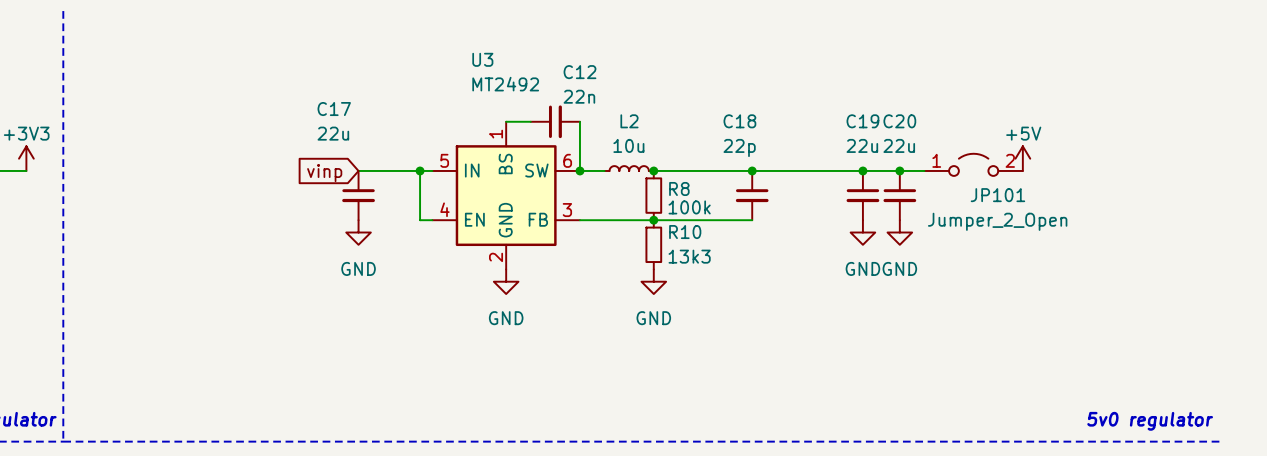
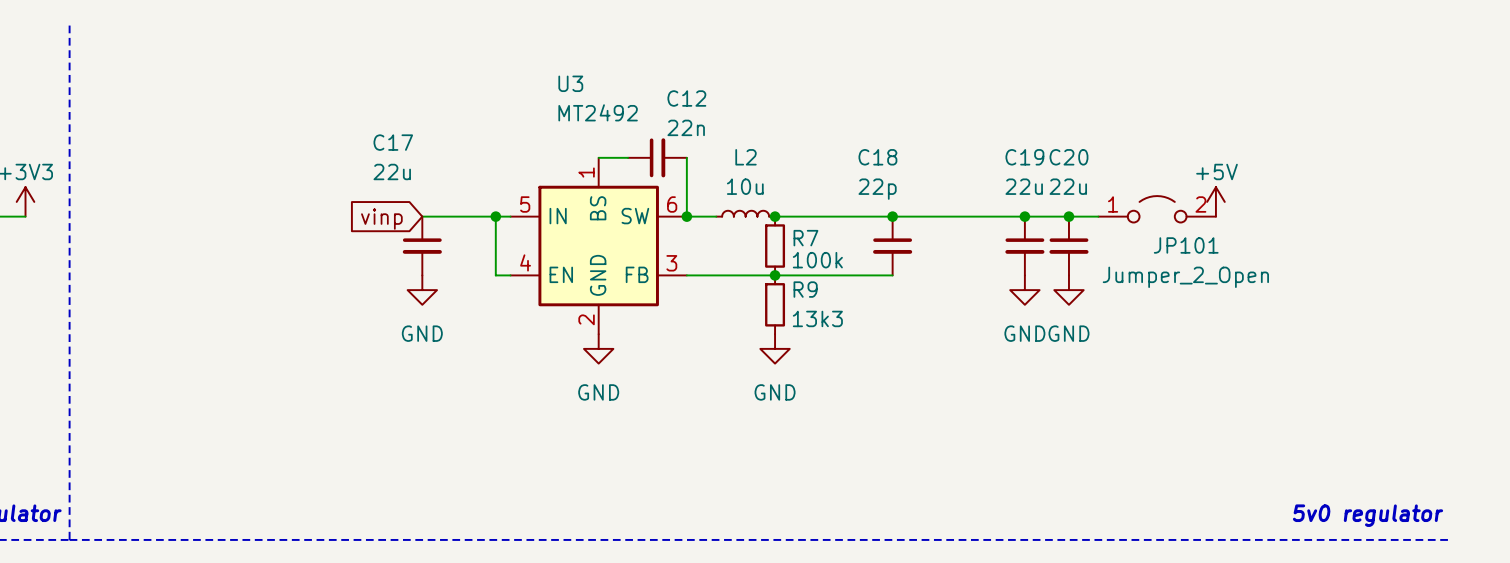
R8 name: R8 (679, 188) -> R7 (805, 238)
R10 name: R10 (685, 232) -> R9 (805, 289)

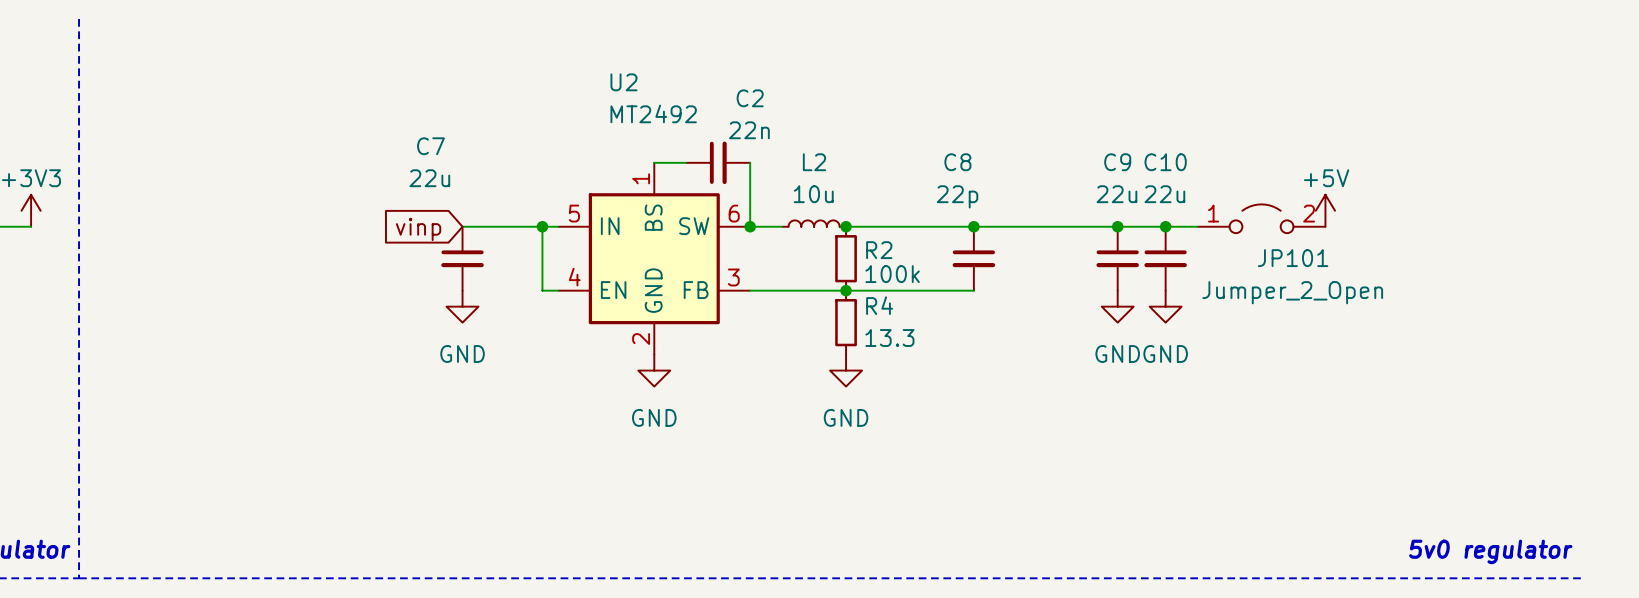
U3 name: U3 (570, 83) -> U2 (623, 82)
C12 name: C12 (686, 98) -> C2 (750, 98)
C17 name: C17 (393, 142) -> C7 (430, 146)
C18 name: C18 (877, 157) -> C8 (957, 162)
C19 name: C19 (1024, 157) -> C9 (1117, 162)
C20 name: C20 (1068, 157) -> C10 (1165, 162)
R7 name: R7 (805, 238) -> R2 (879, 250)
R9 name: R9 (805, 289) -> R4 (879, 305)
R9 value: 13k3 (817, 318) -> 13.3 (889, 338)

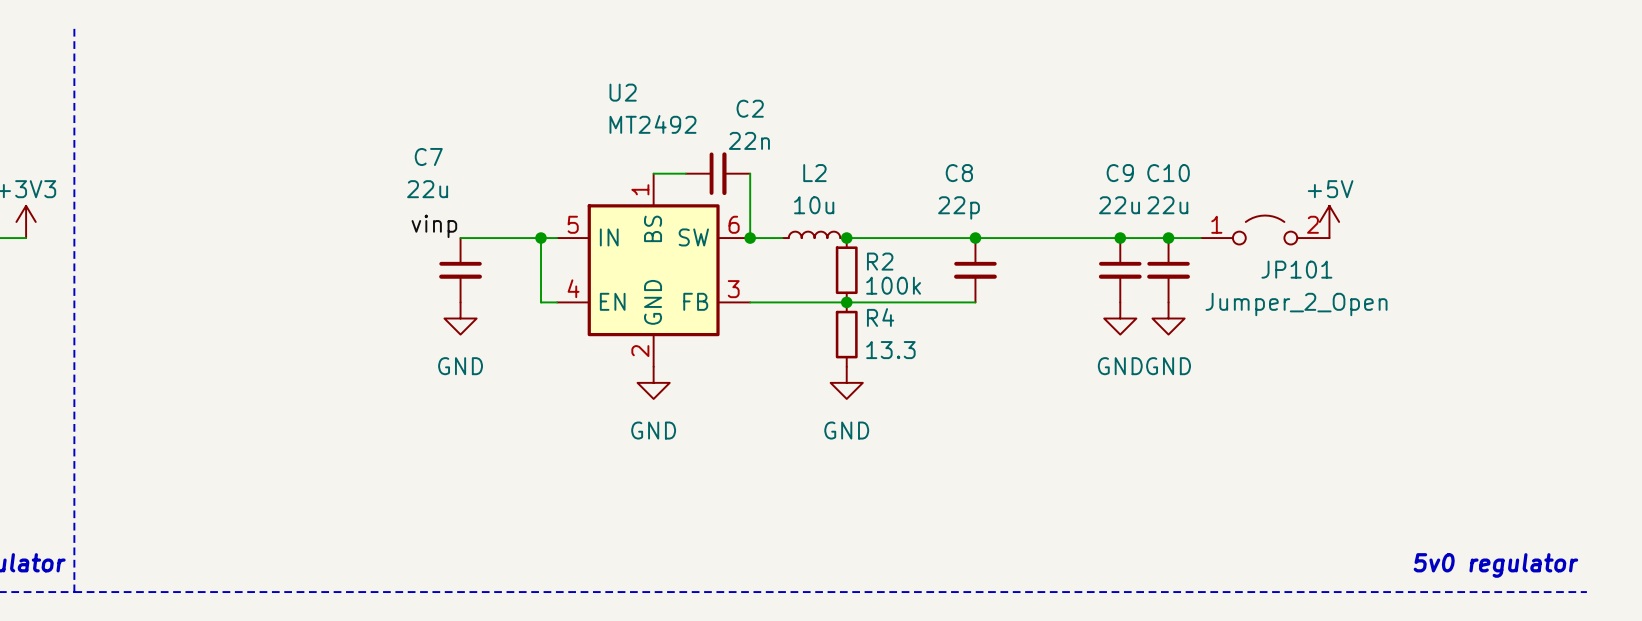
label: none -> vinp (434, 226)
global label: vinp (418, 229) -> none

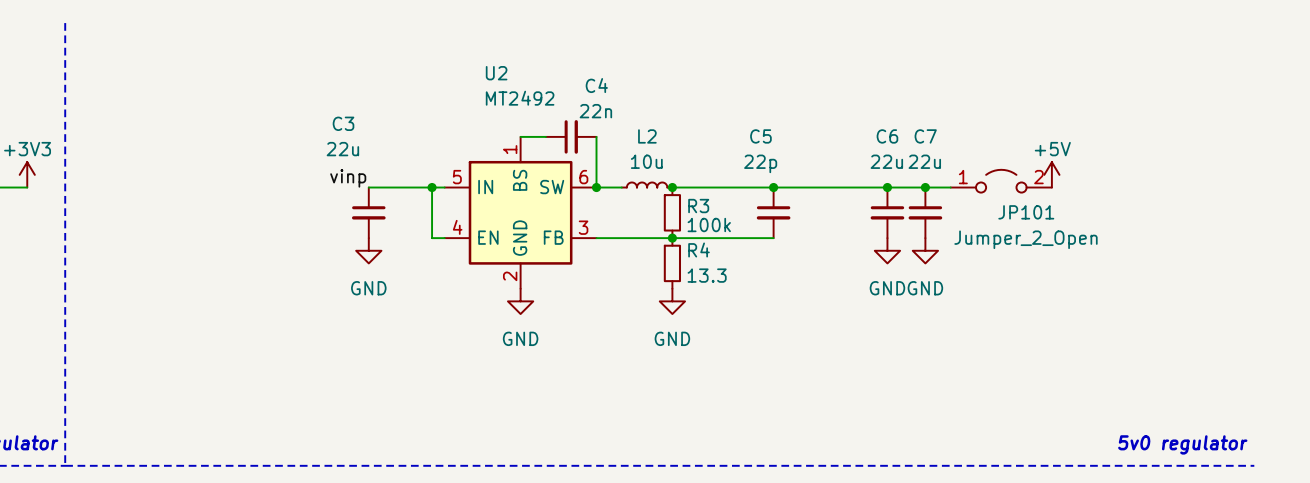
C2 name: C2 (750, 108) -> C4 (596, 85)
C7 name: C7 (428, 156) -> C3 (343, 123)
C8 name: C8 (959, 173) -> C5 (760, 136)
C9 name: C9 (1120, 173) -> C6 (887, 136)
C10 name: C10 (1168, 173) -> C7 (925, 136)
R2 name: R2 (880, 261) -> R3 (698, 206)

